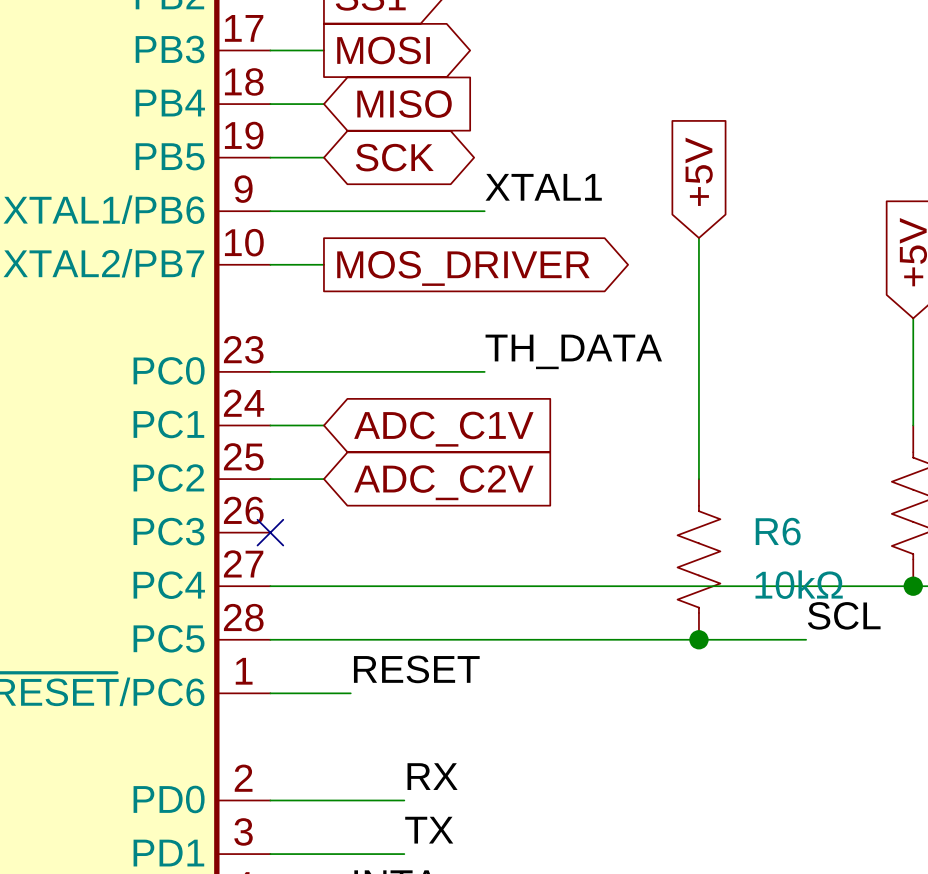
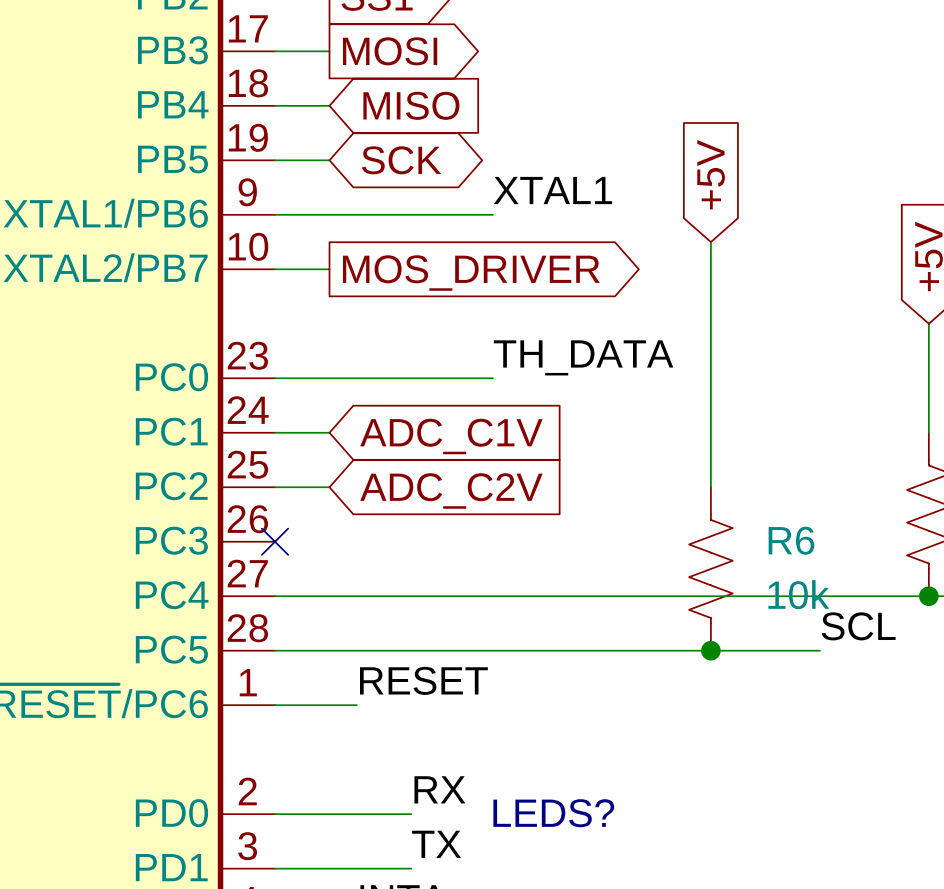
R6 value: 10kΩ (799, 584) -> 10k (798, 594)
text: none -> LEDS? (553, 813)

